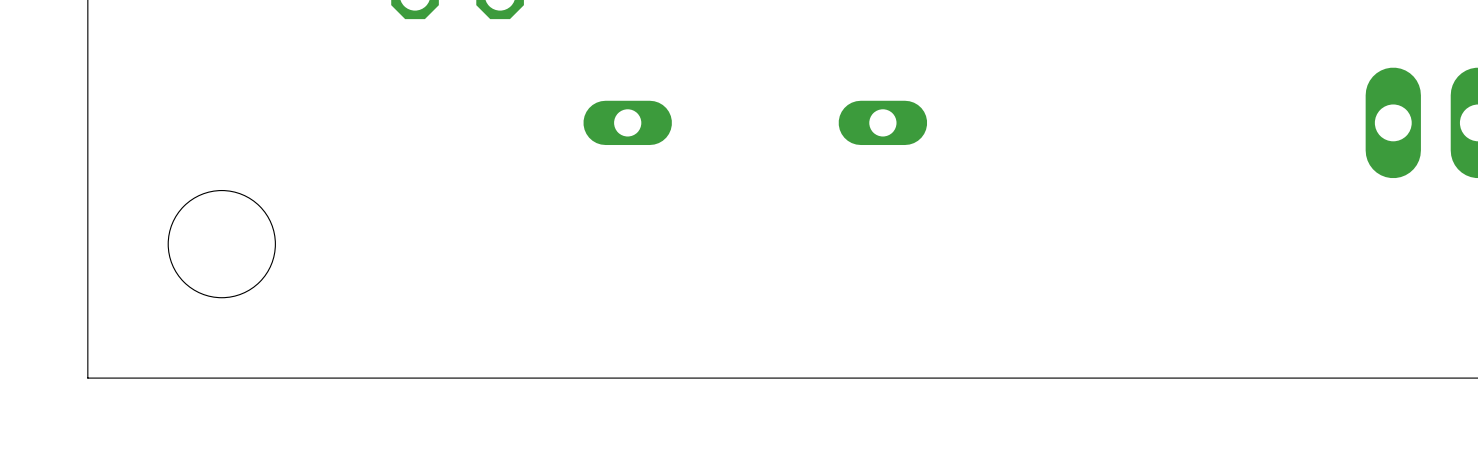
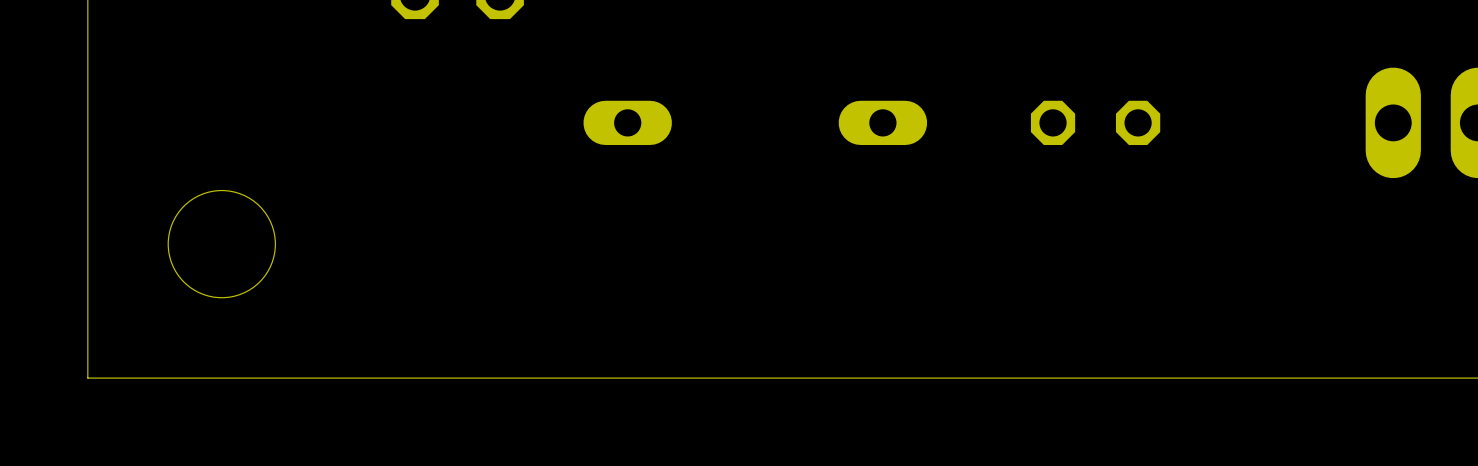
part: none -> (1095, 122)

